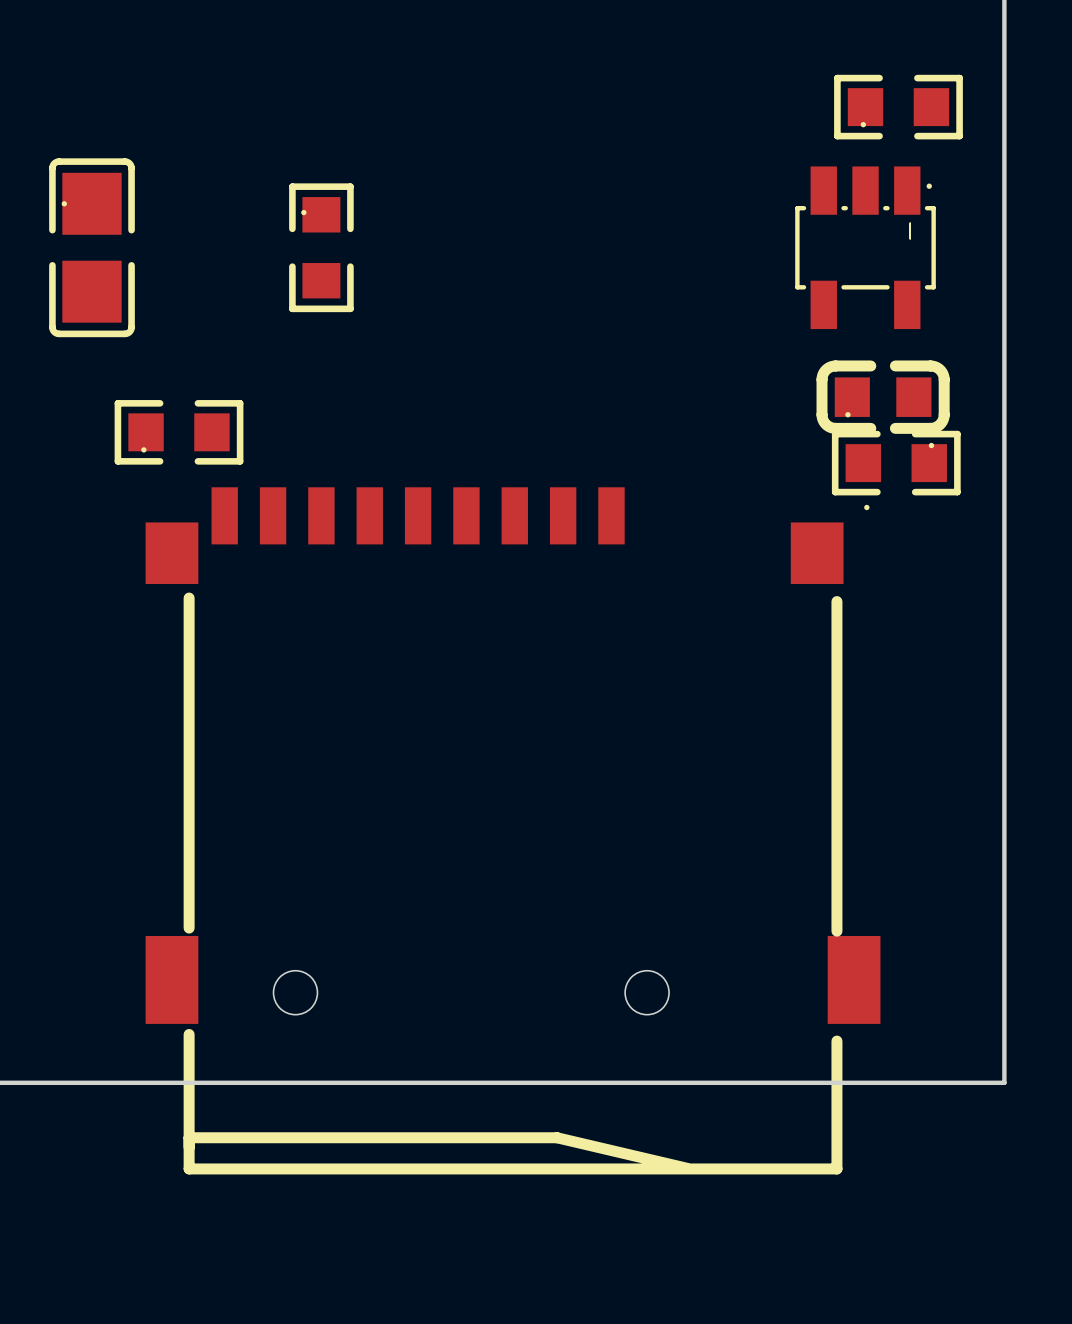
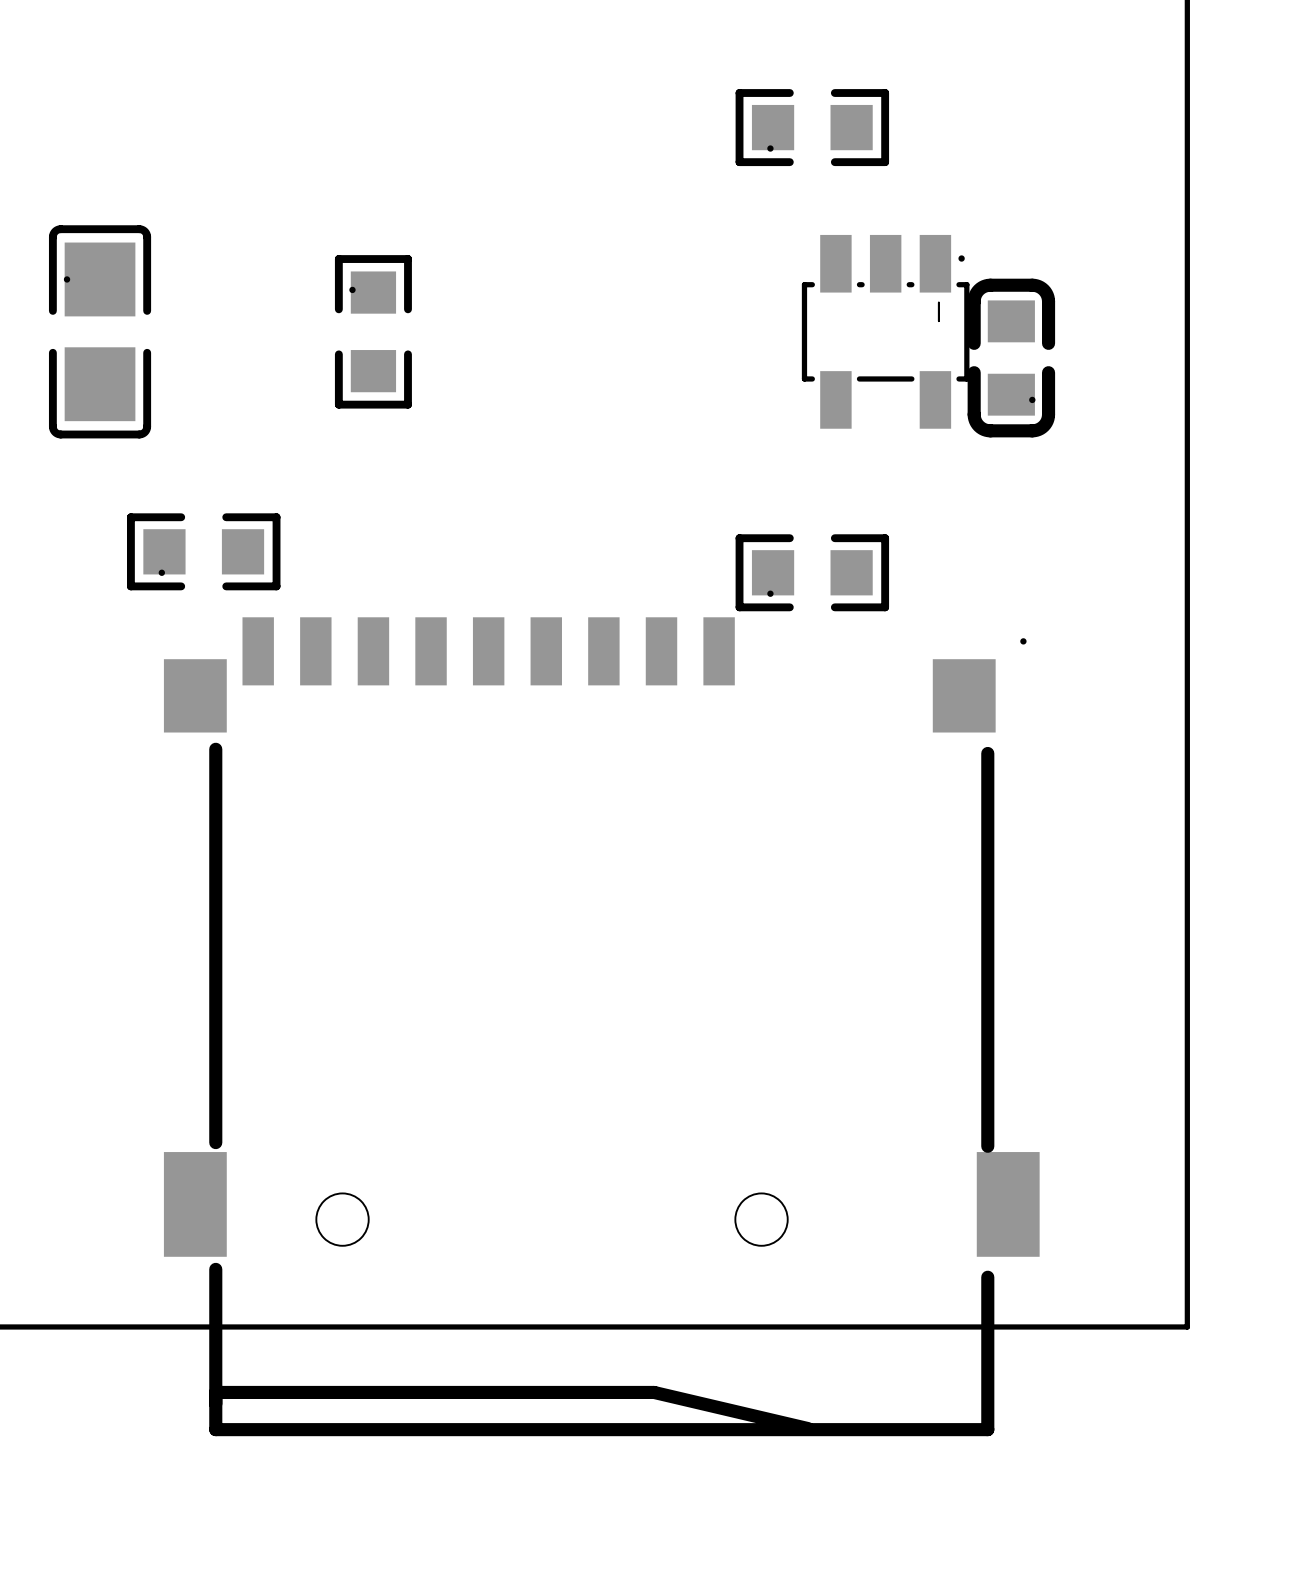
part: none -> (812, 127)
part: (898, 107) -> none
part footprint: [795, 166, 936, 330] -> [967, 278, 1056, 438]
part: none -> (885, 331)
part: (883, 397) -> none
part: none -> (812, 572)
part: (896, 463) -> none

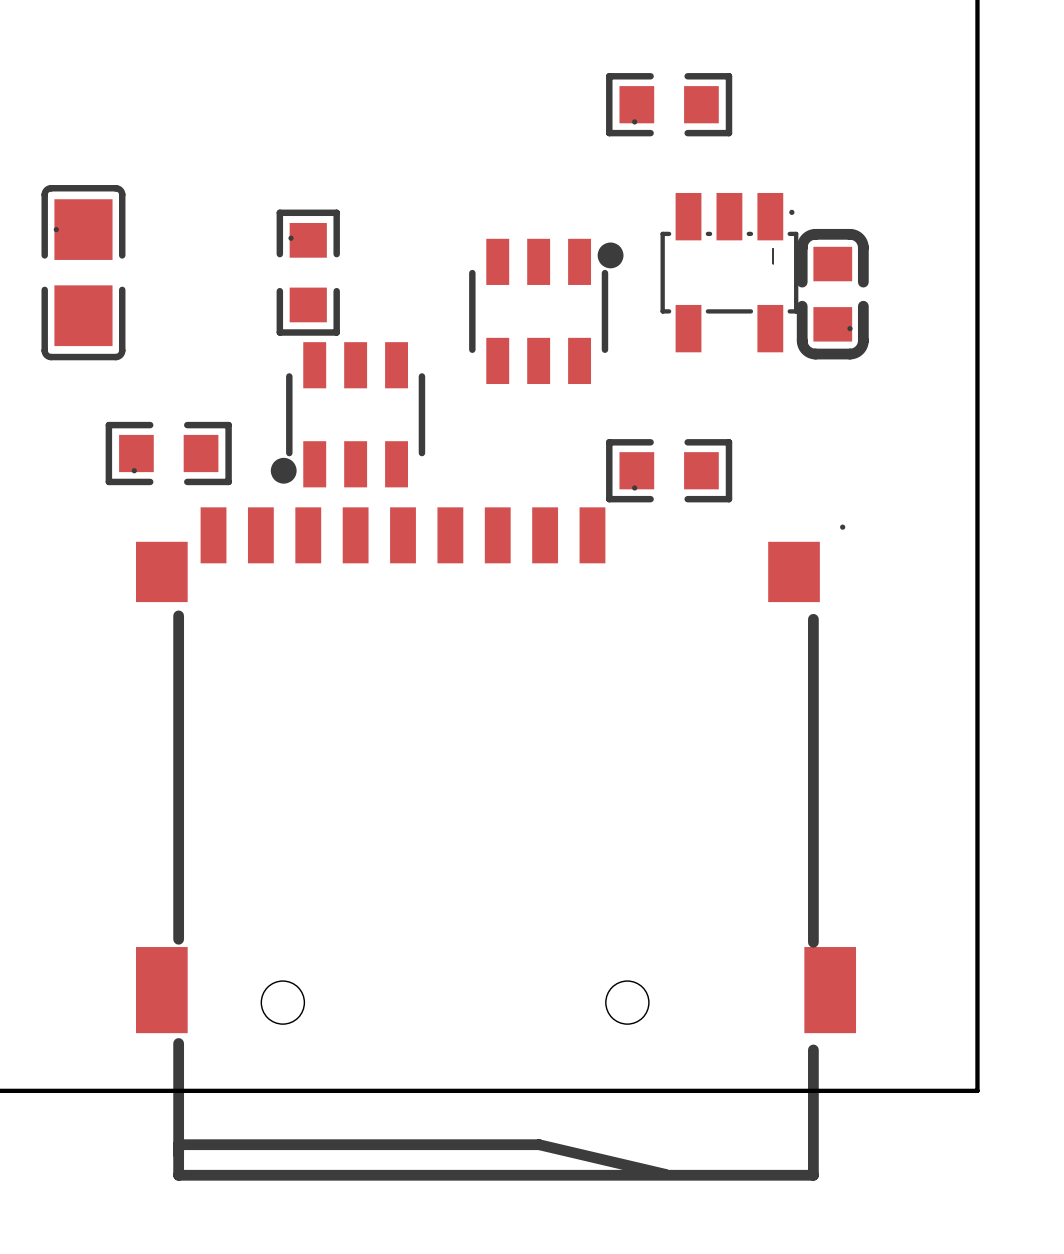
part: none -> (546, 311)
part: none -> (347, 414)

